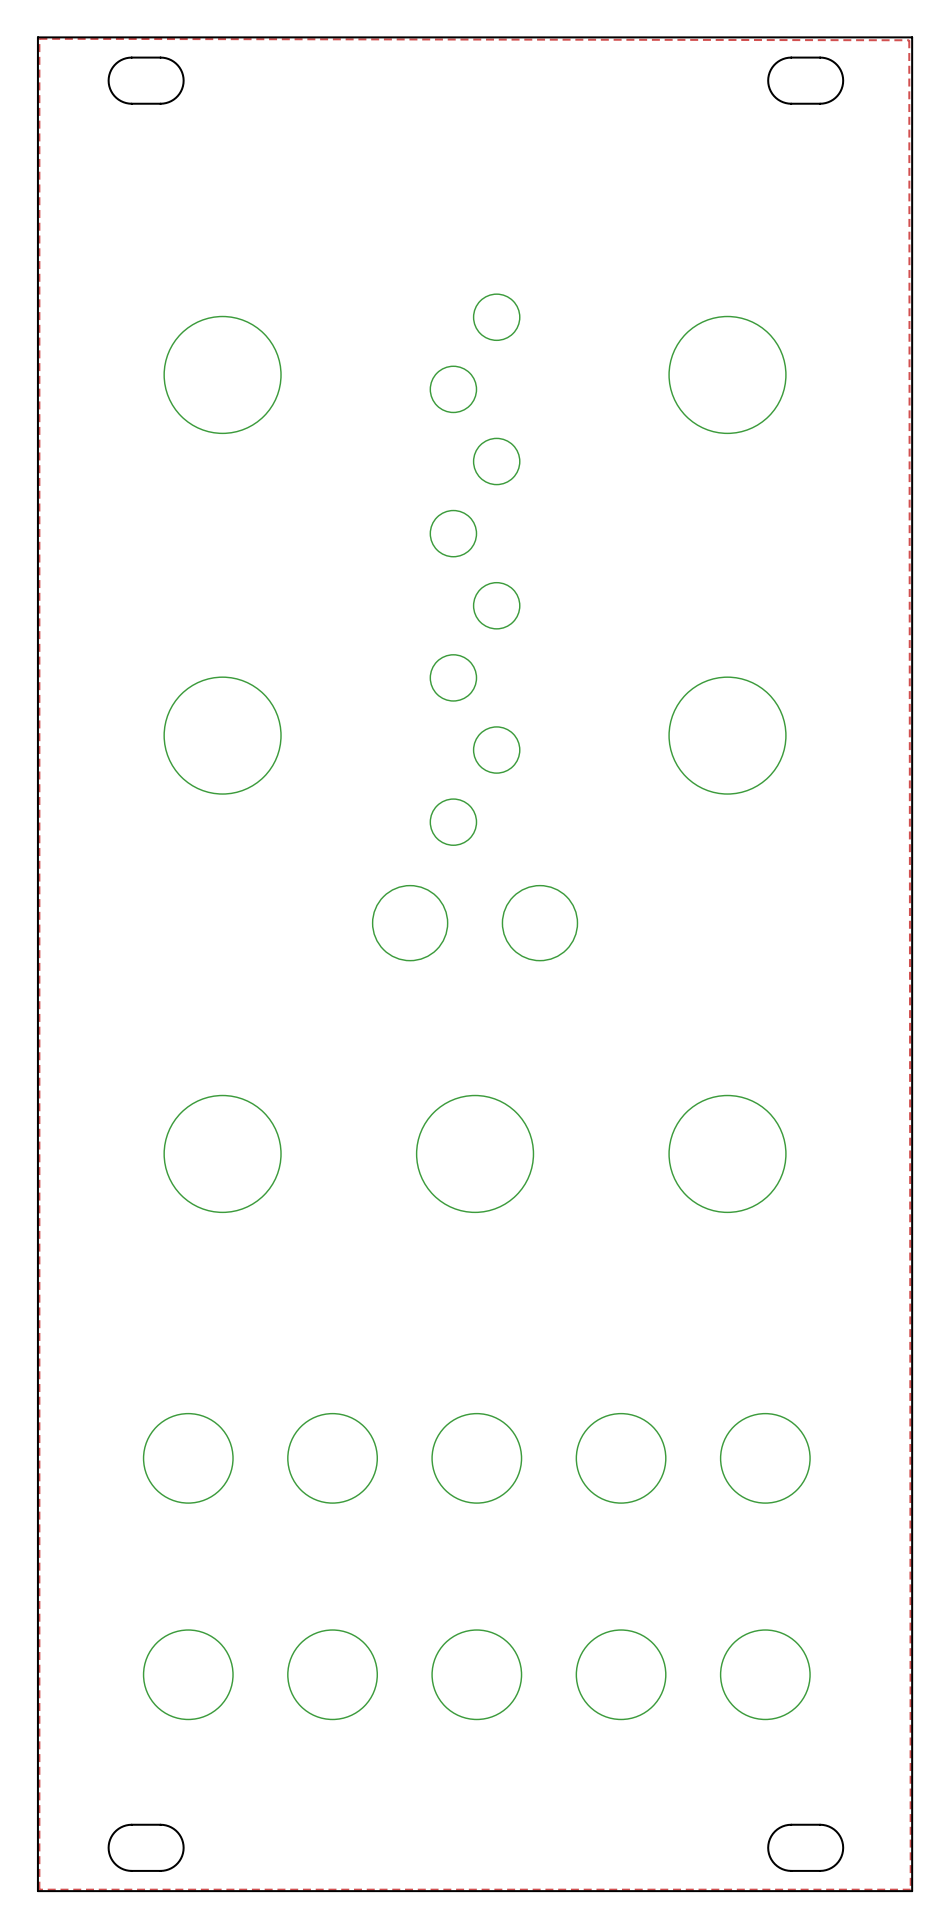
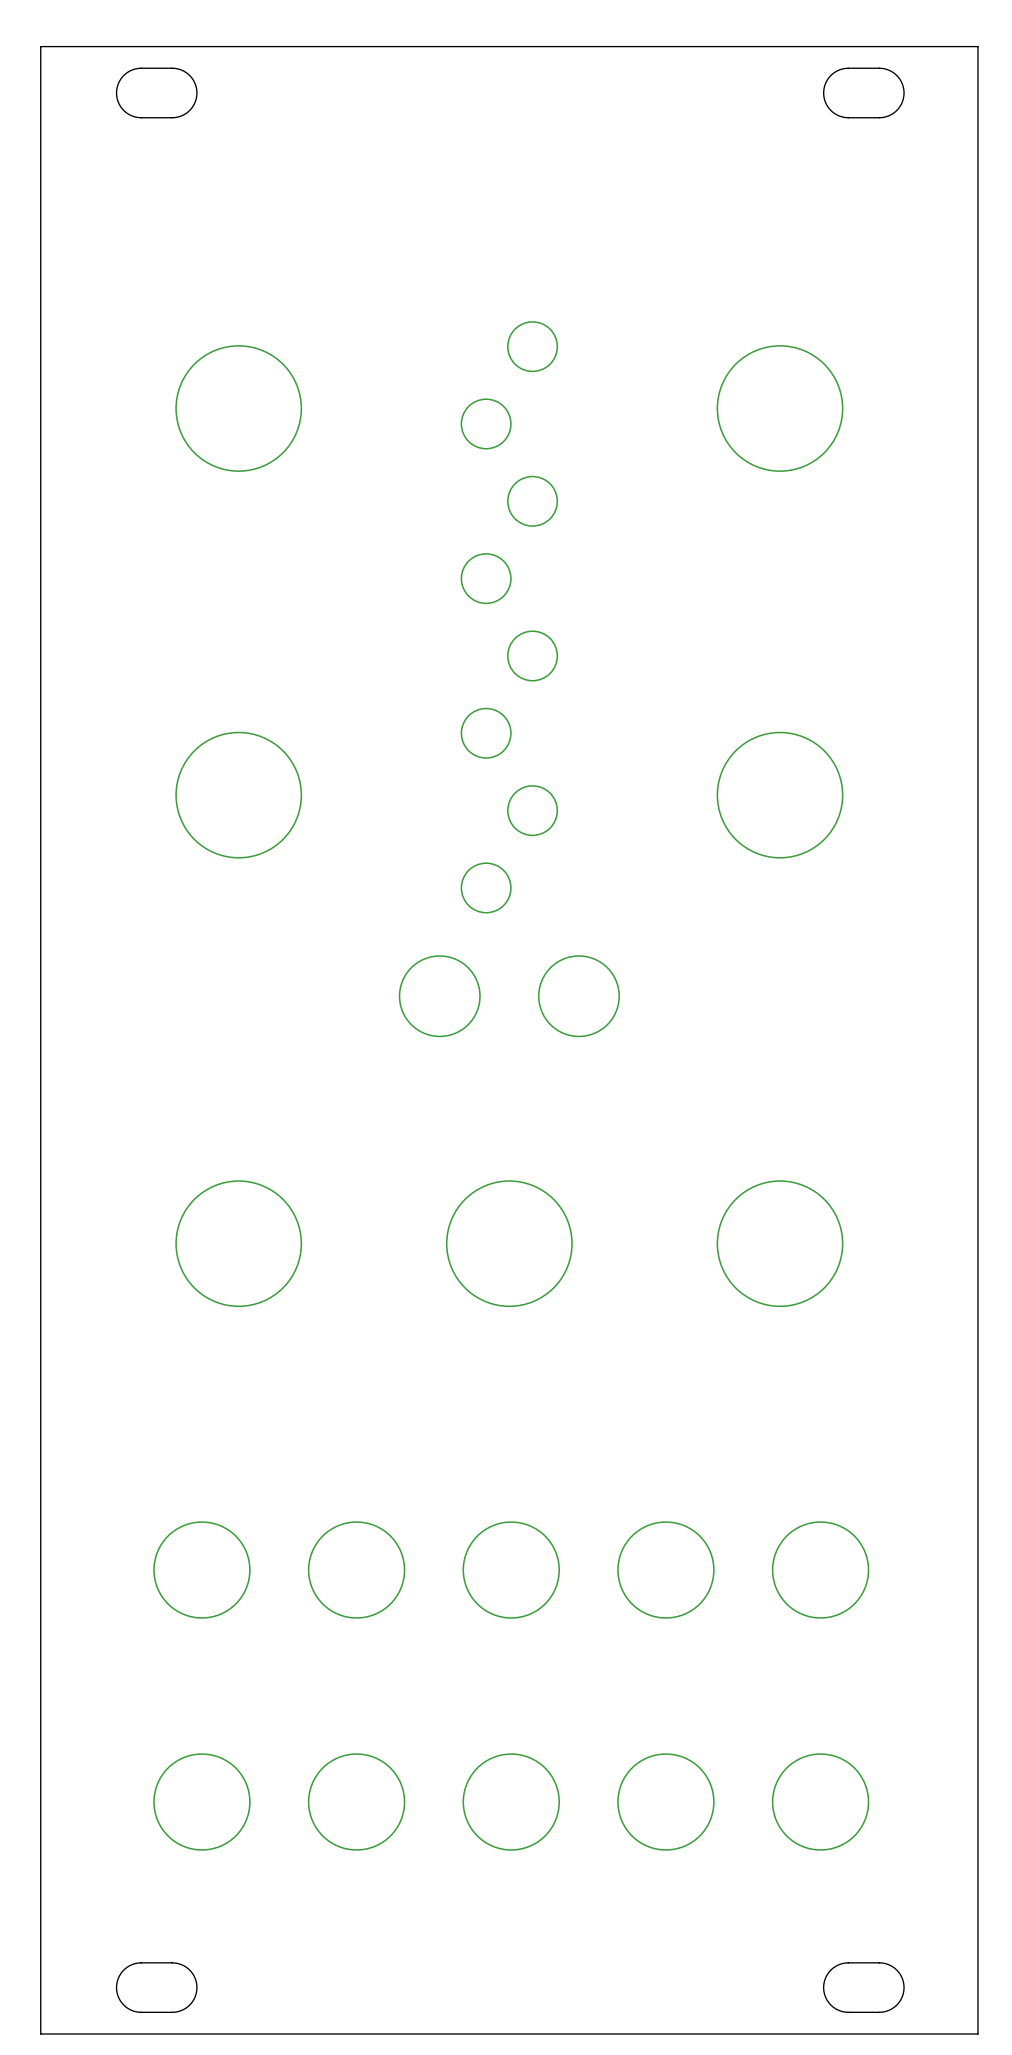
zone outline: (39, 38) (909, 40) (910, 1889) (39, 1889) (39, 38) -> none

